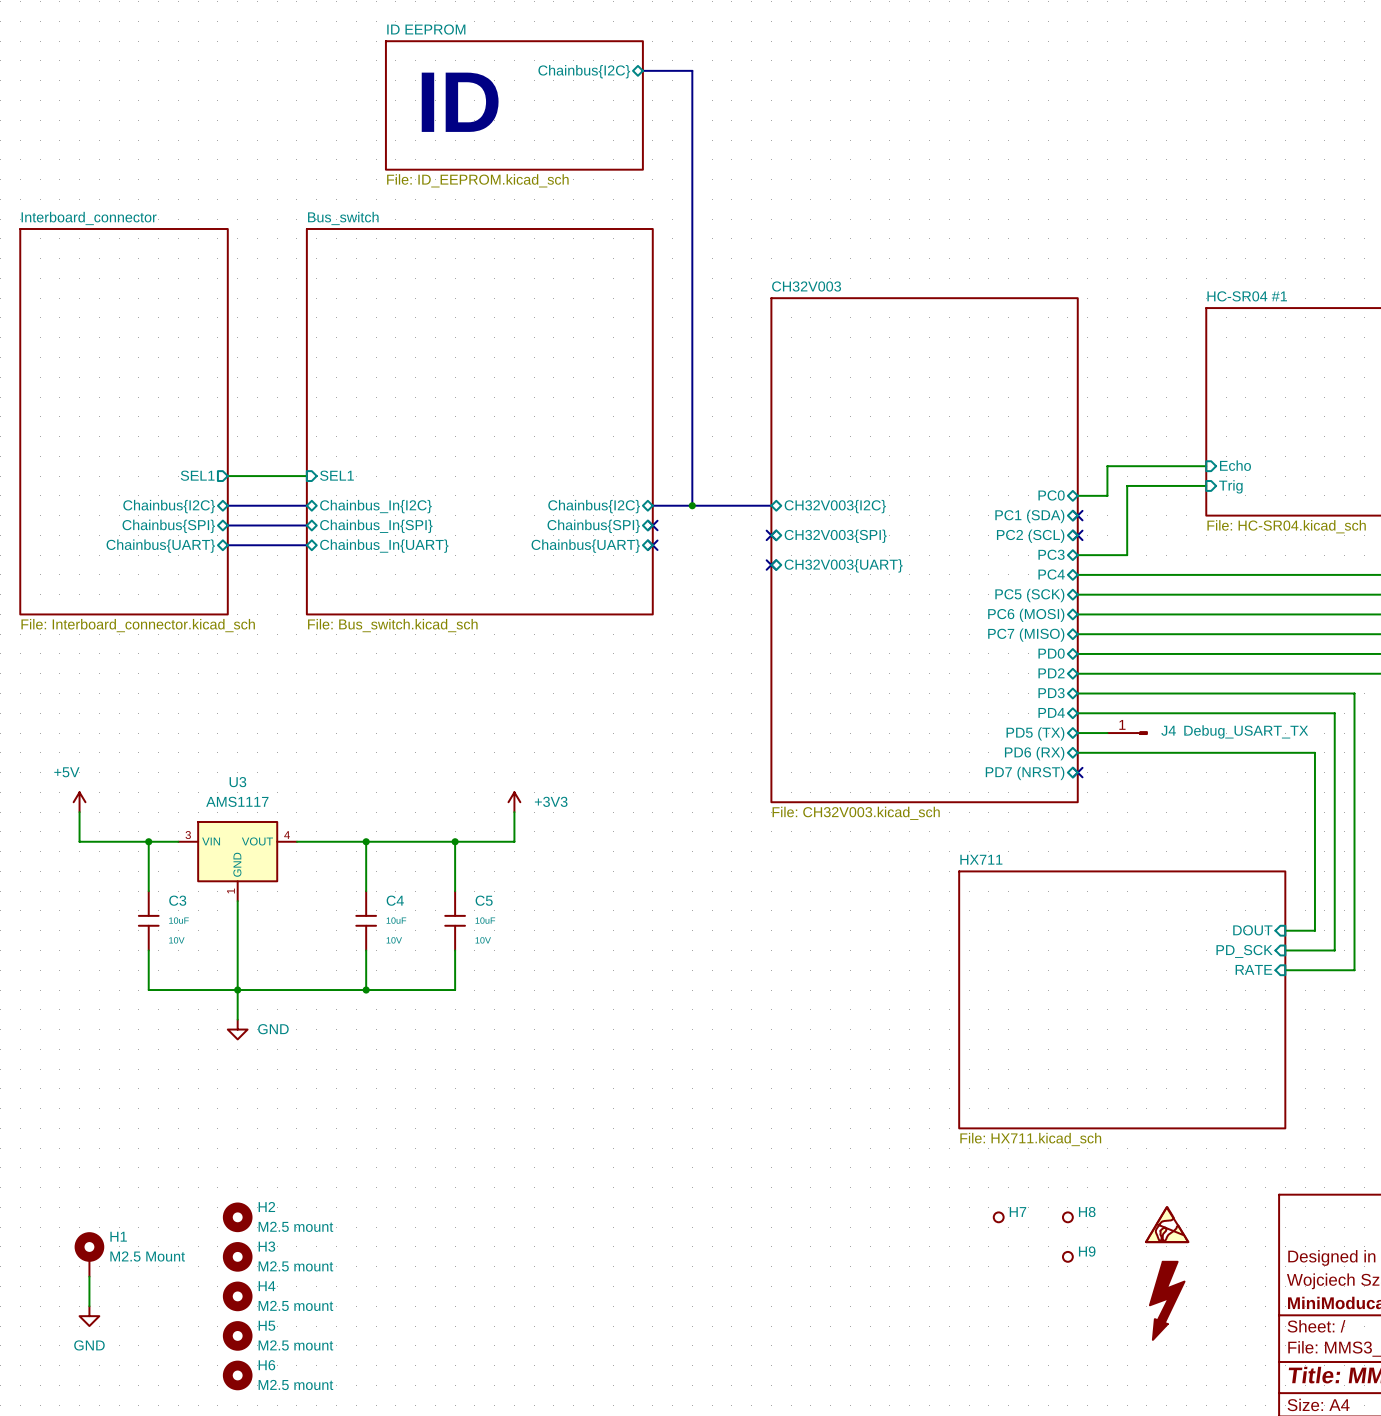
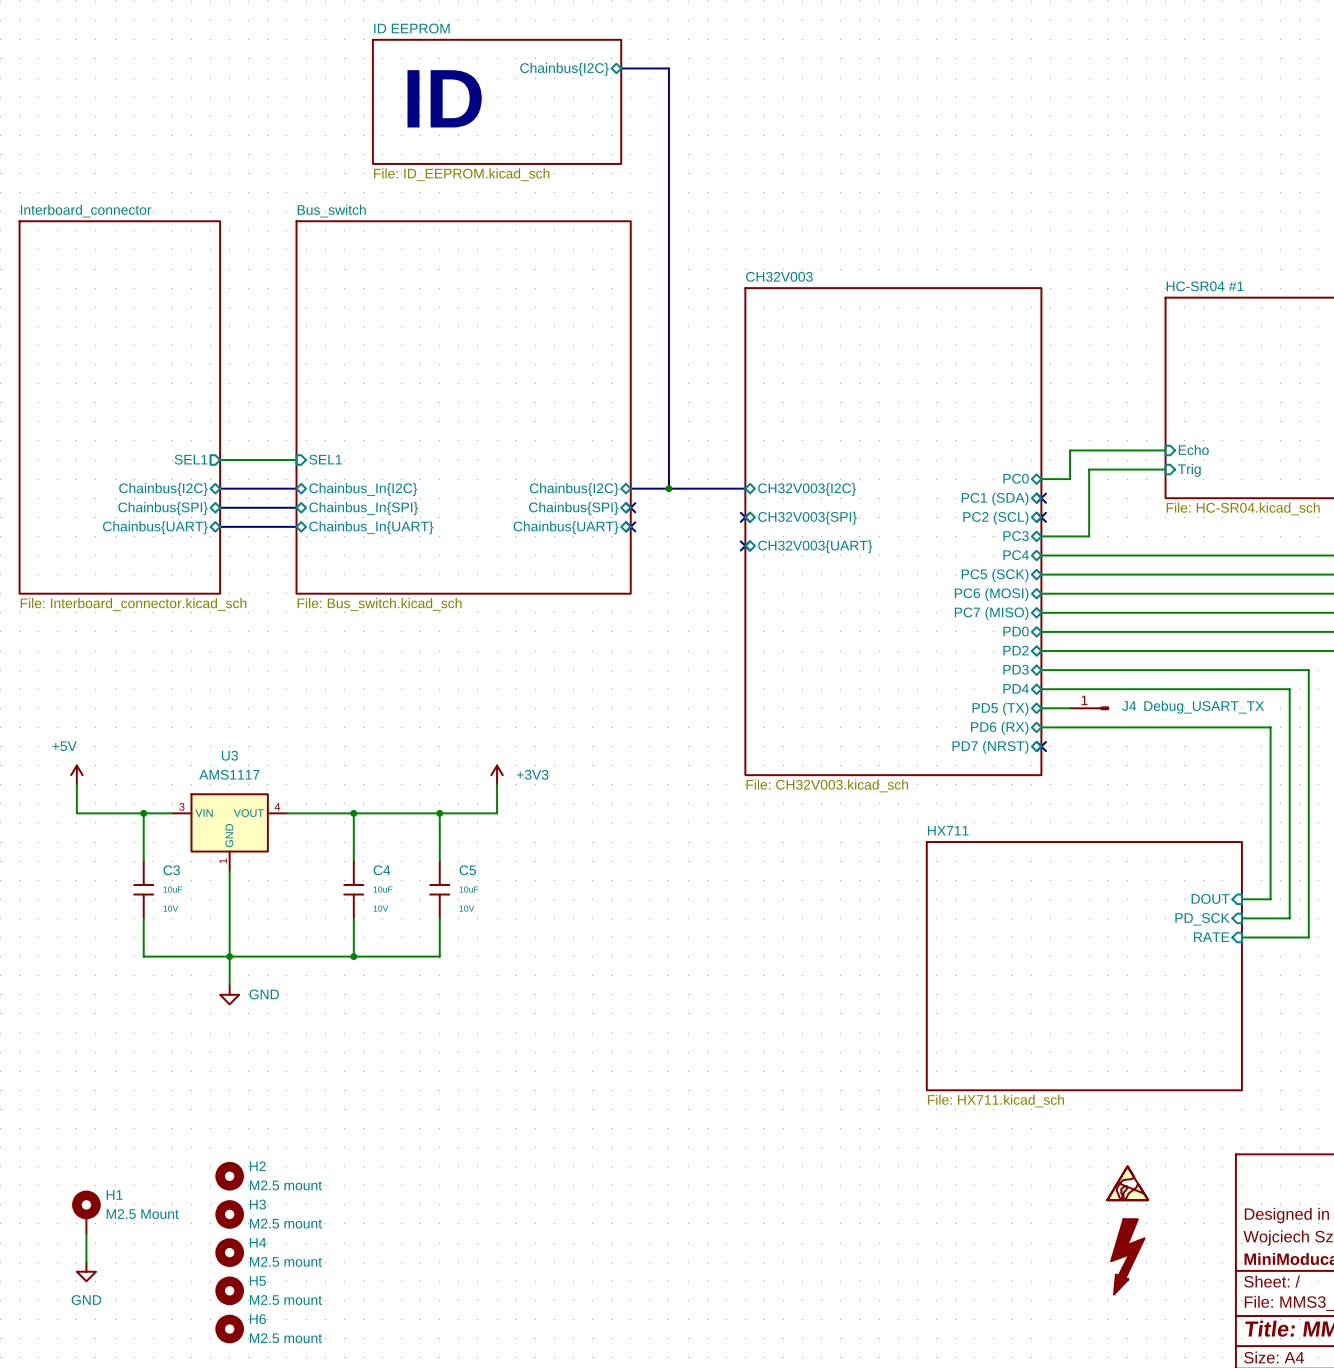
H7: (998, 1217) -> none
H8: (1067, 1217) -> none
H9: (1067, 1256) -> none

